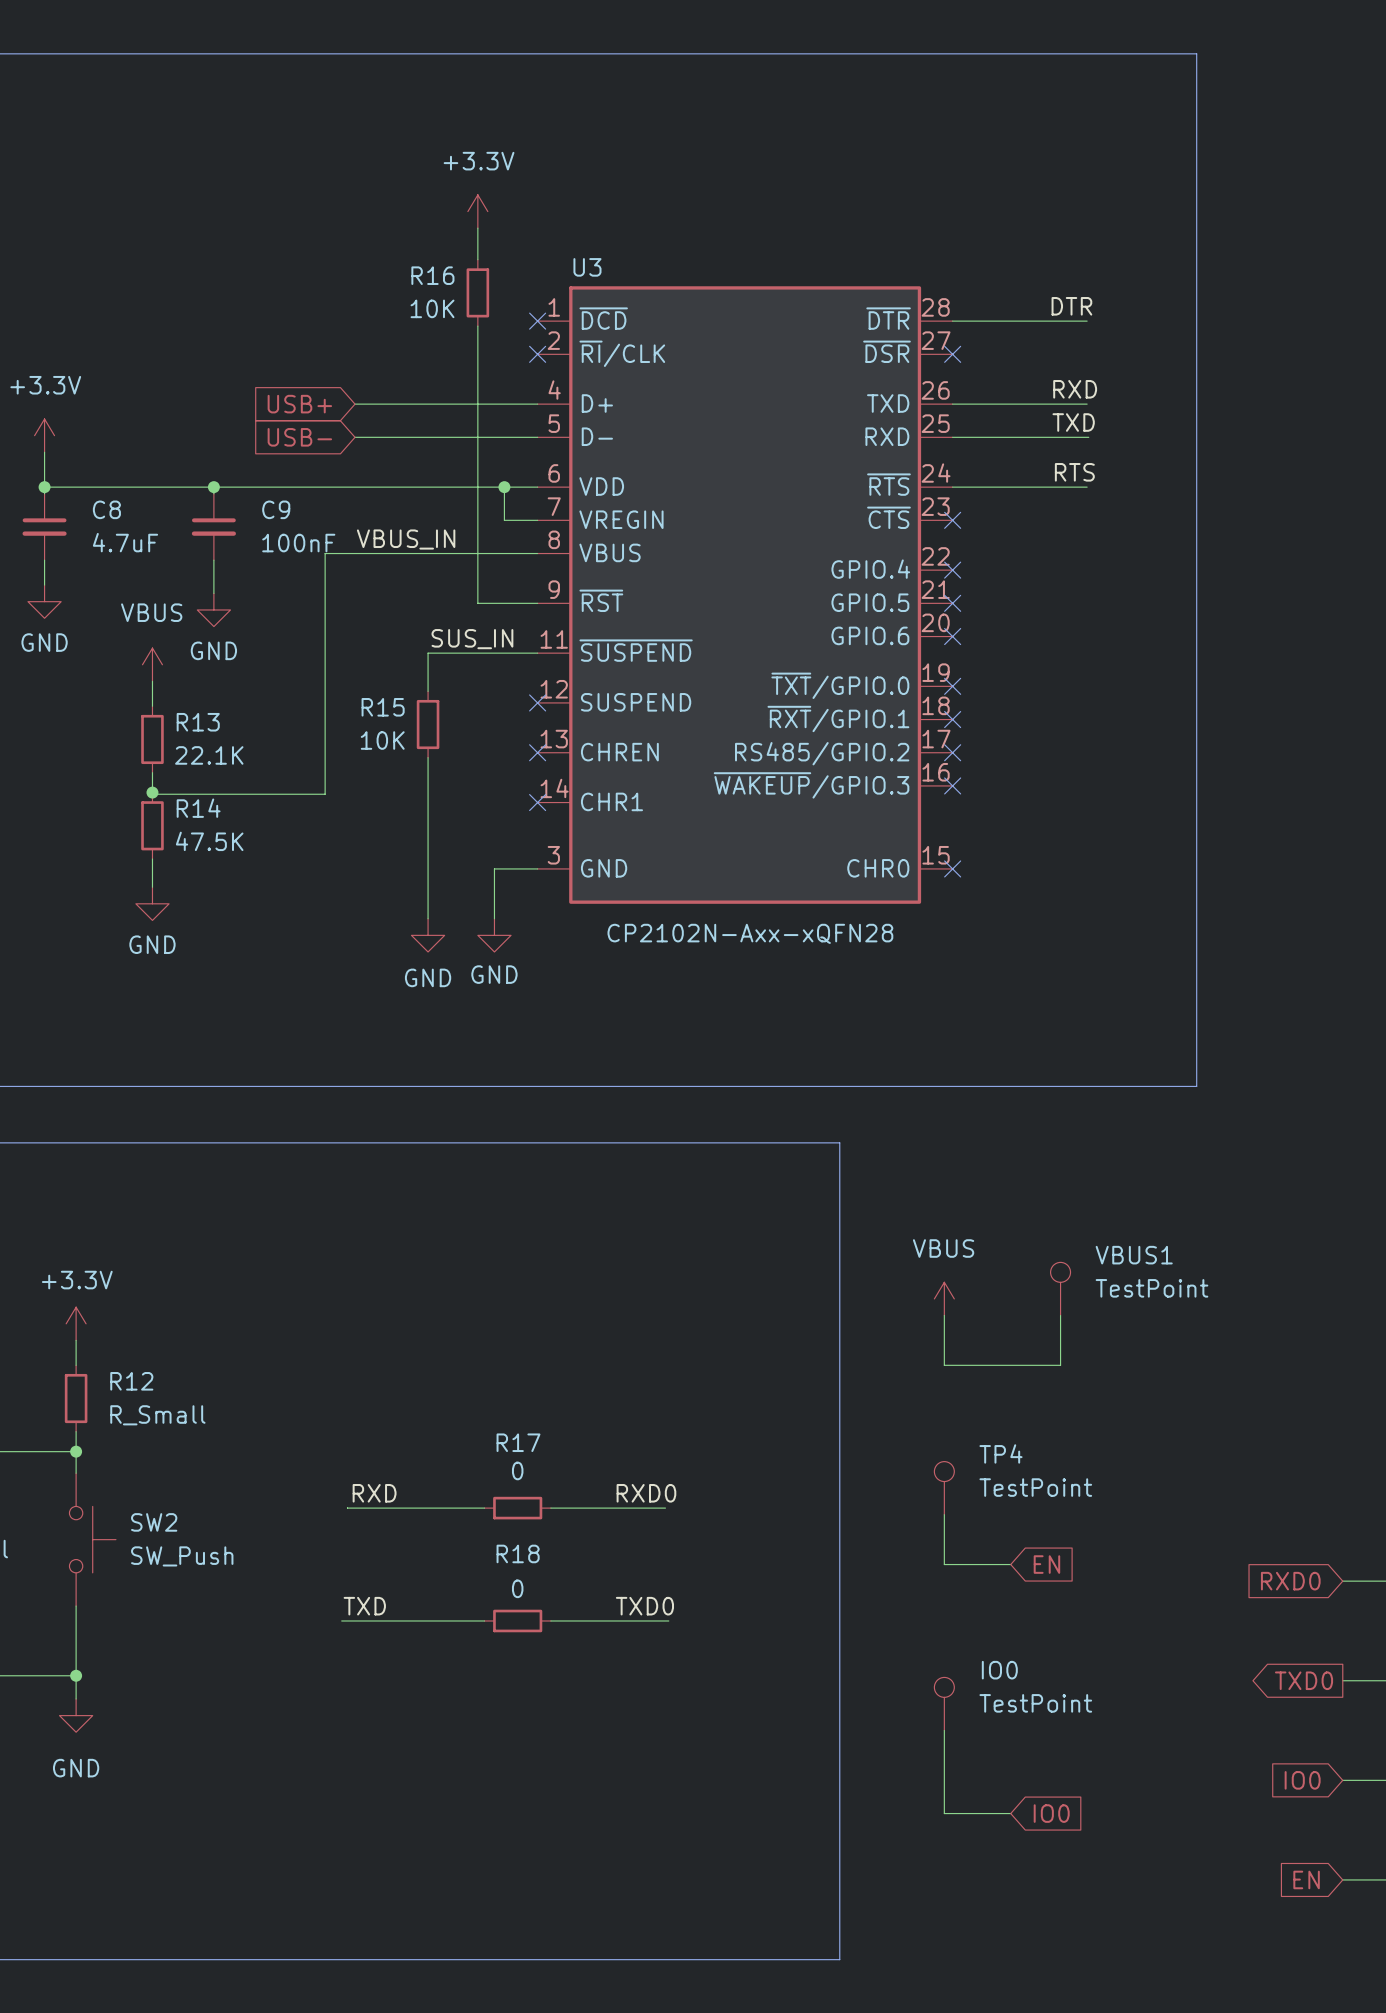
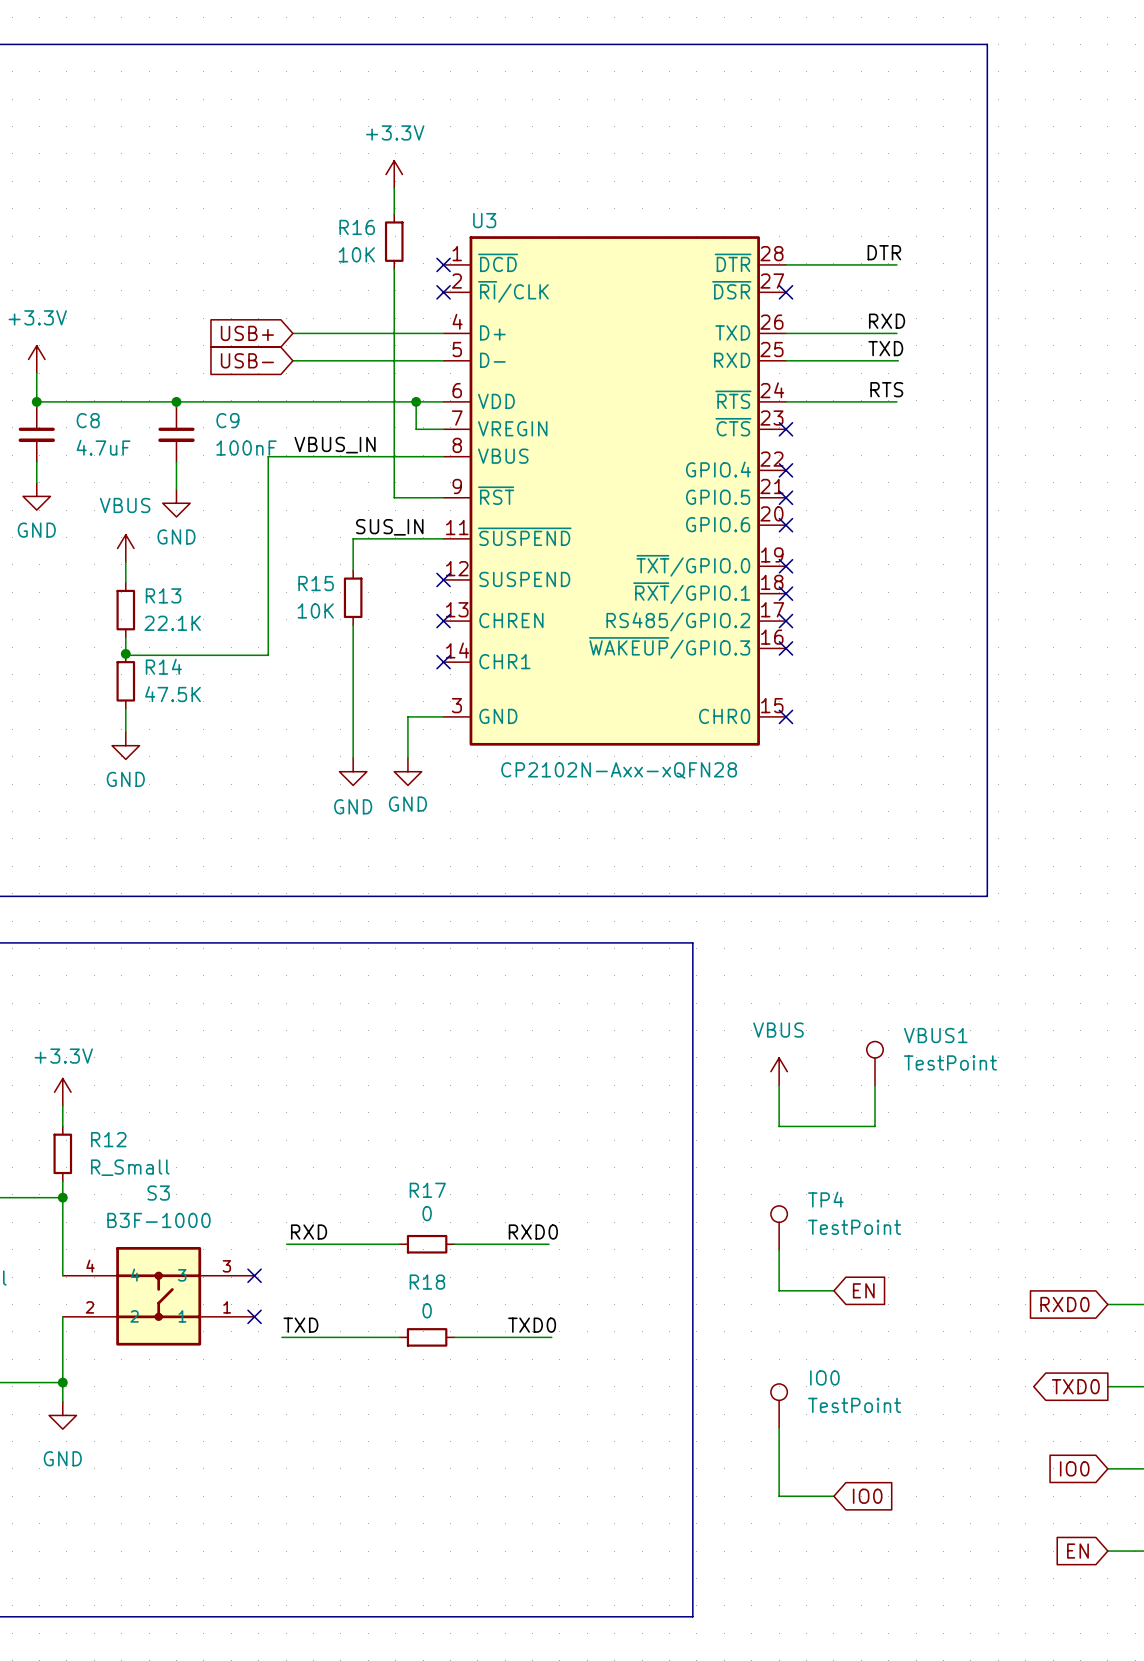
wire: none -> (62, 1215) (62, 1275)
SW2: SW_Push (92, 1539) -> none
no-connect mark: none -> (254, 1275)
S3: none -> B3F-1000 (158, 1296)
no-connect mark: none -> (254, 1316)

